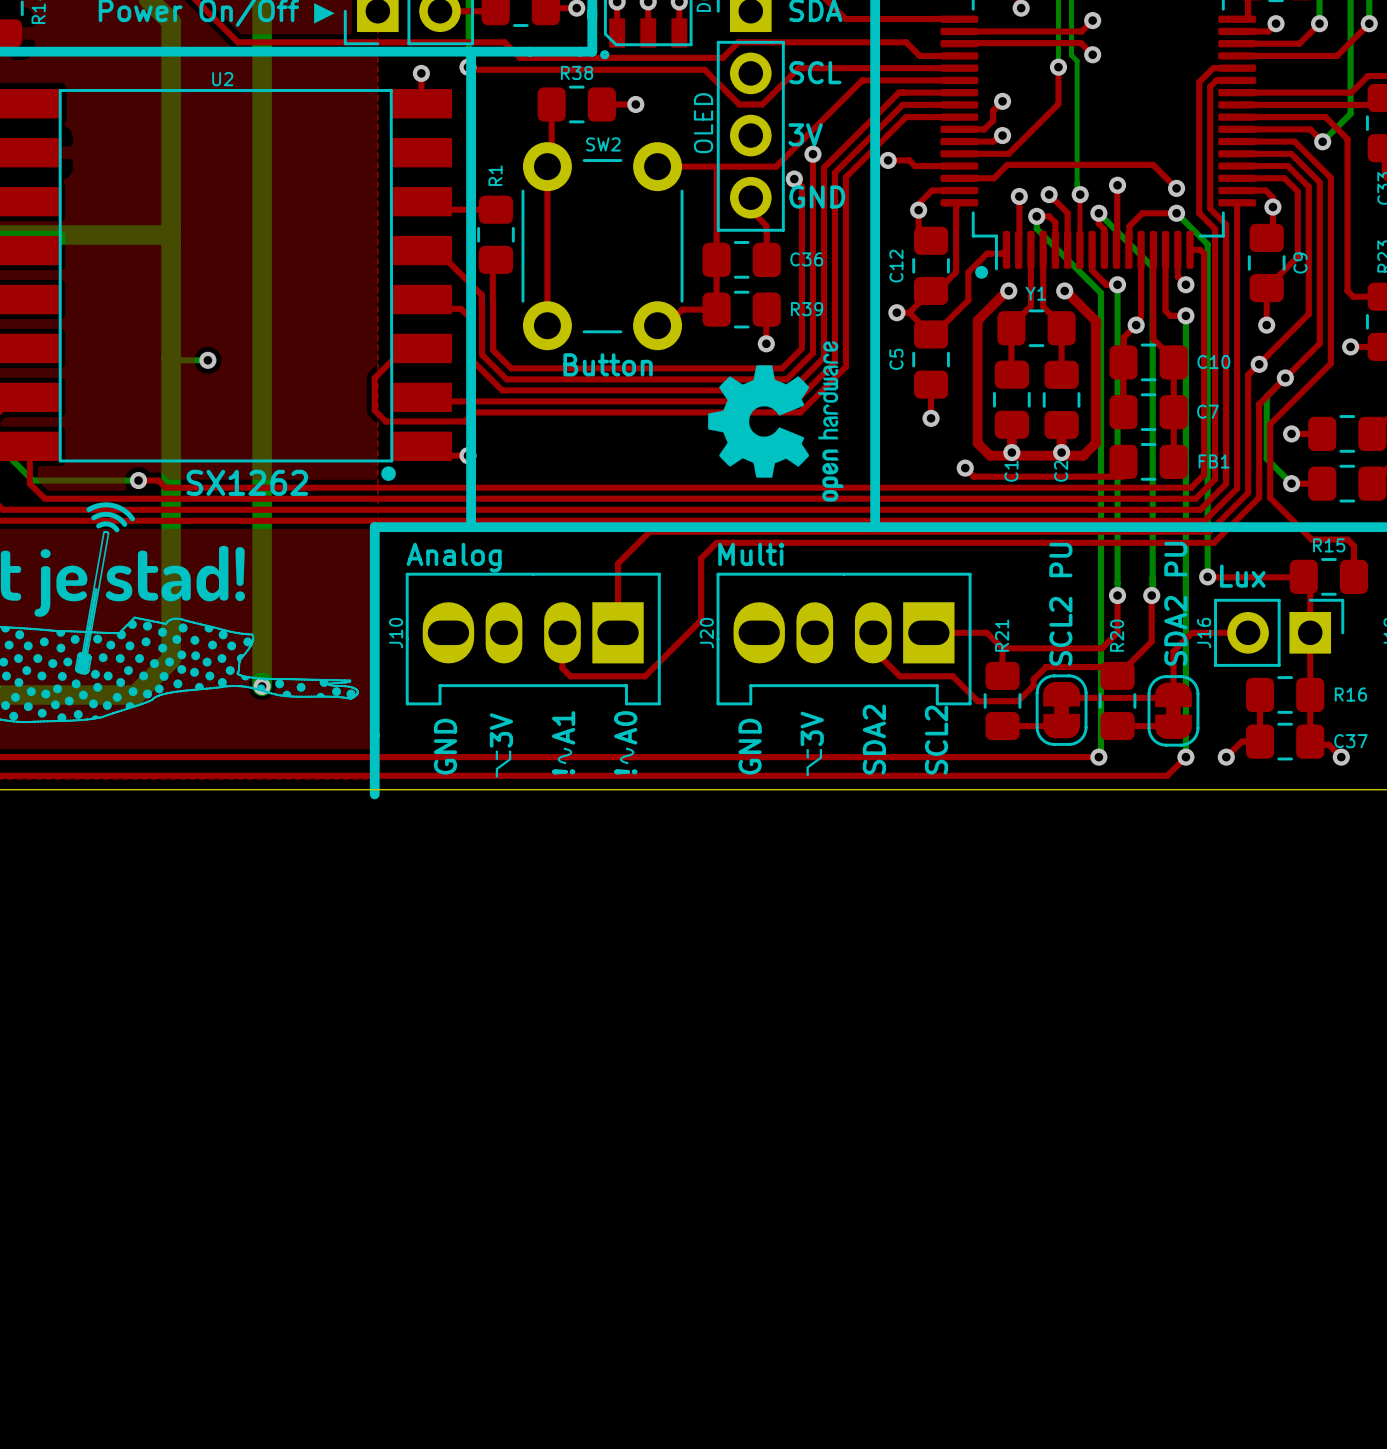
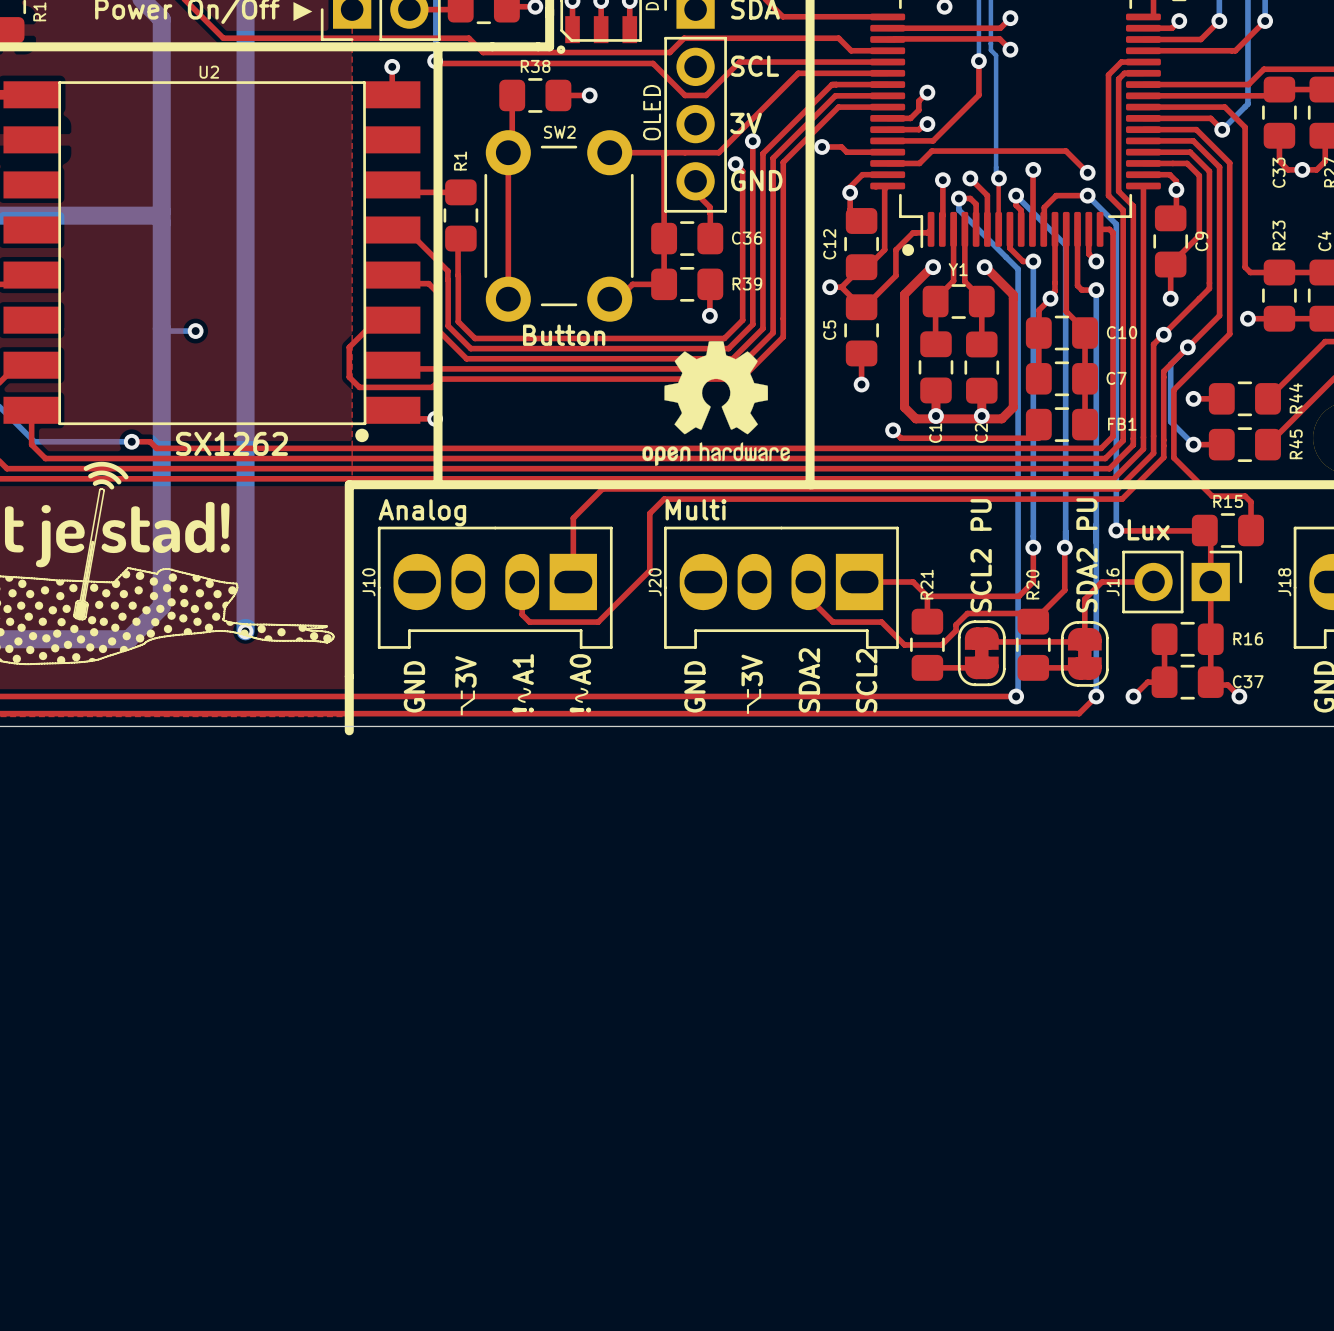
drawing shape: [708, 341, 844, 502] -> [642, 341, 790, 466]

